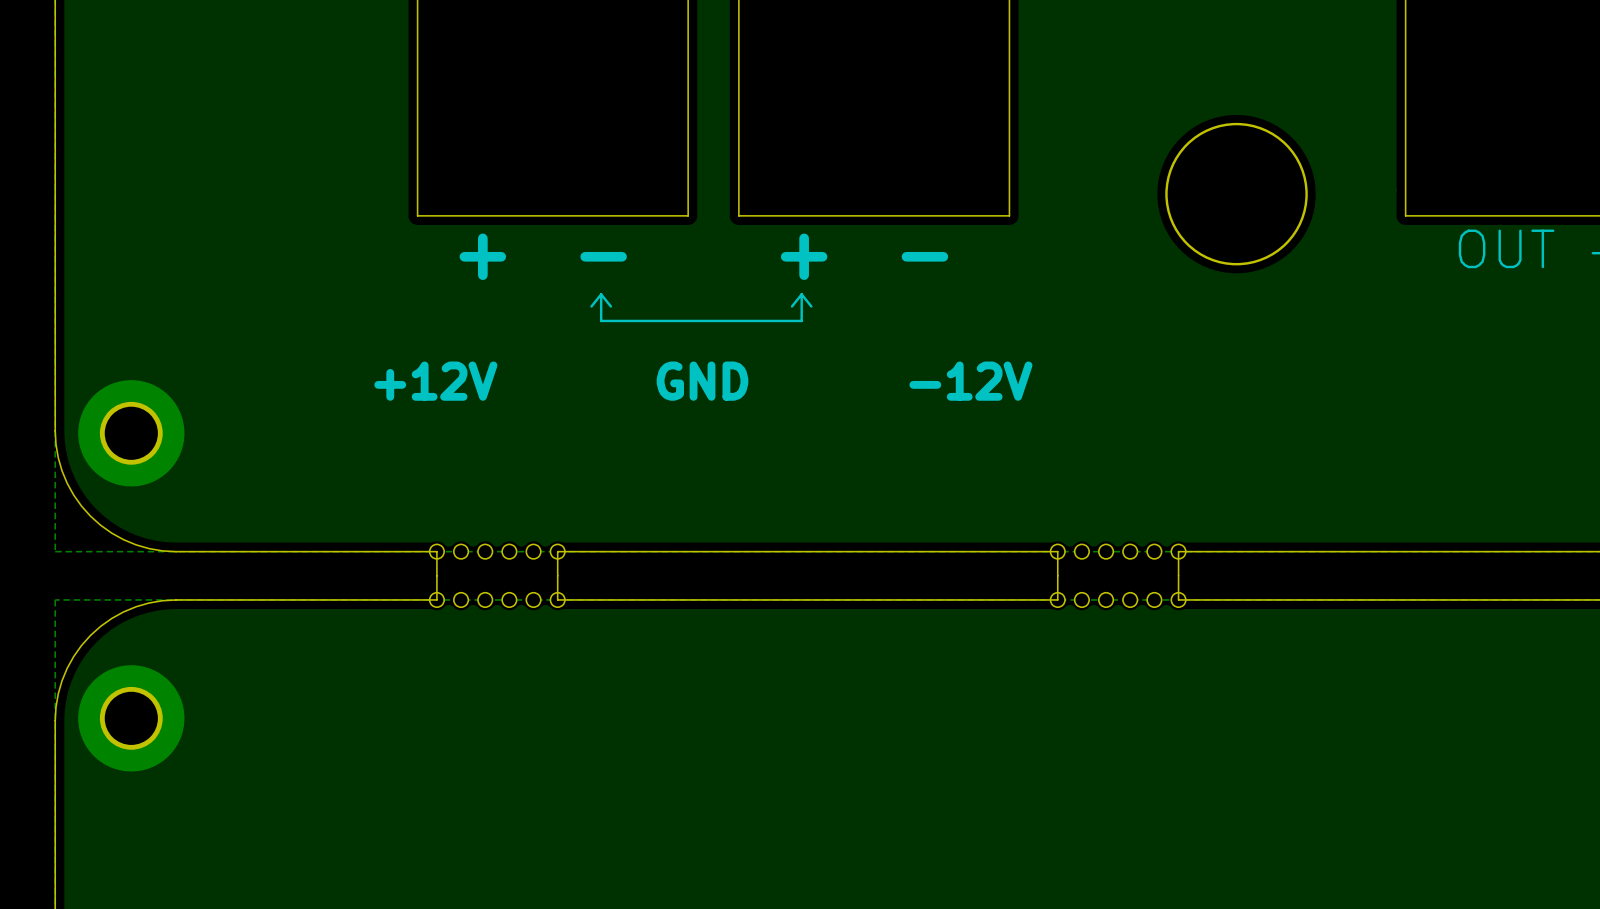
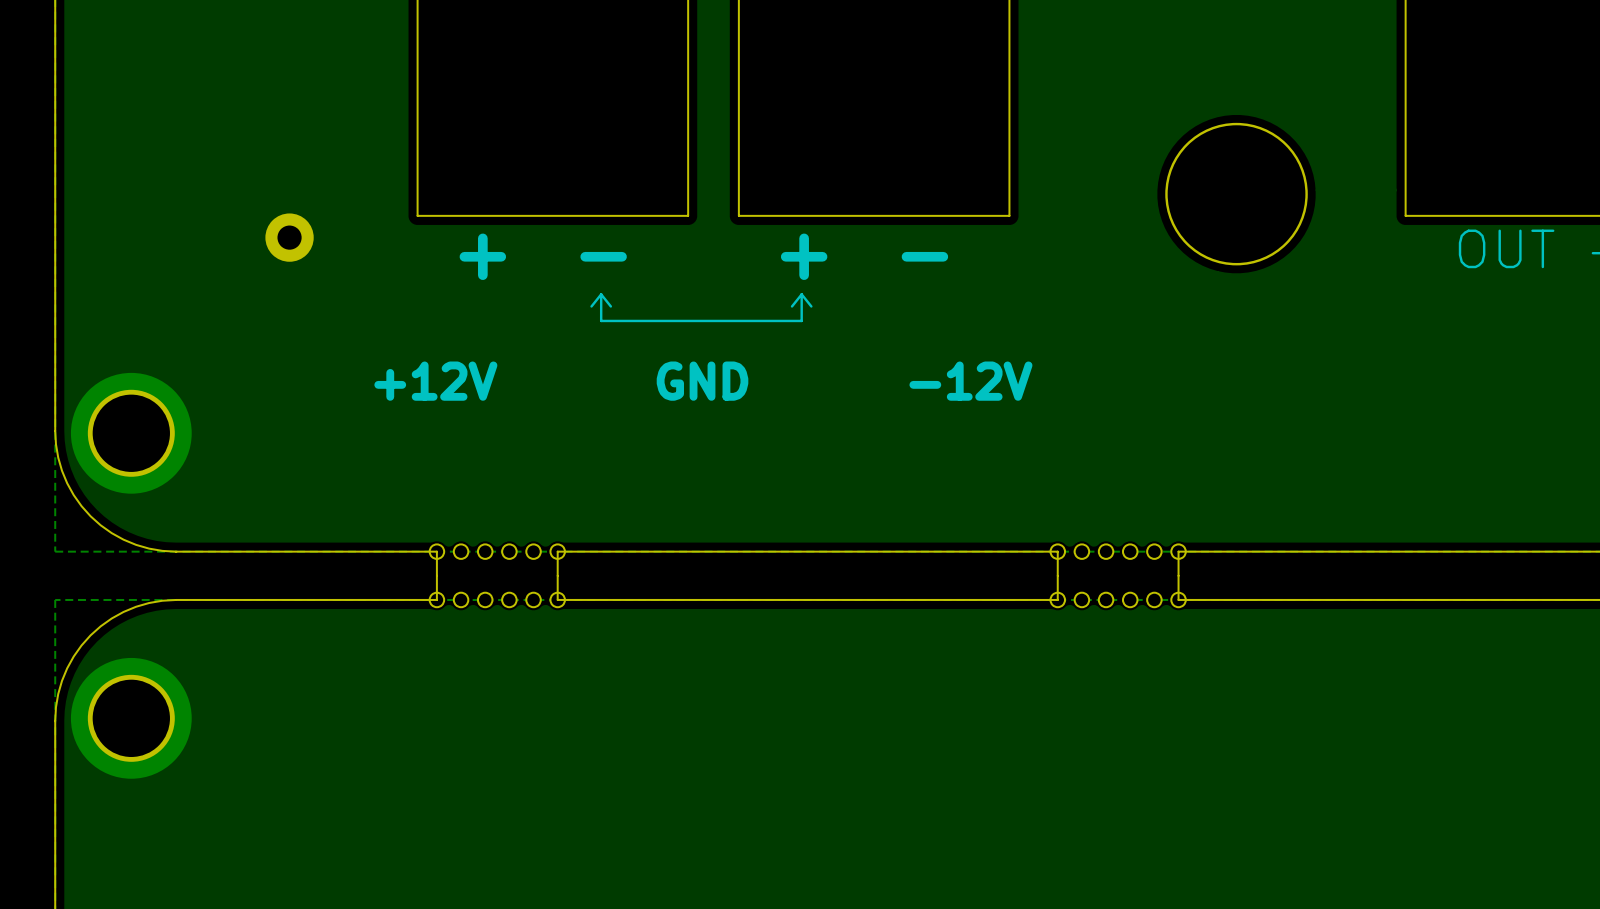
part: none -> (289, 237)
part footprint: [78, 380, 185, 487] -> [70, 372, 192, 494]
part footprint: [78, 665, 185, 772] -> [70, 657, 192, 779]

